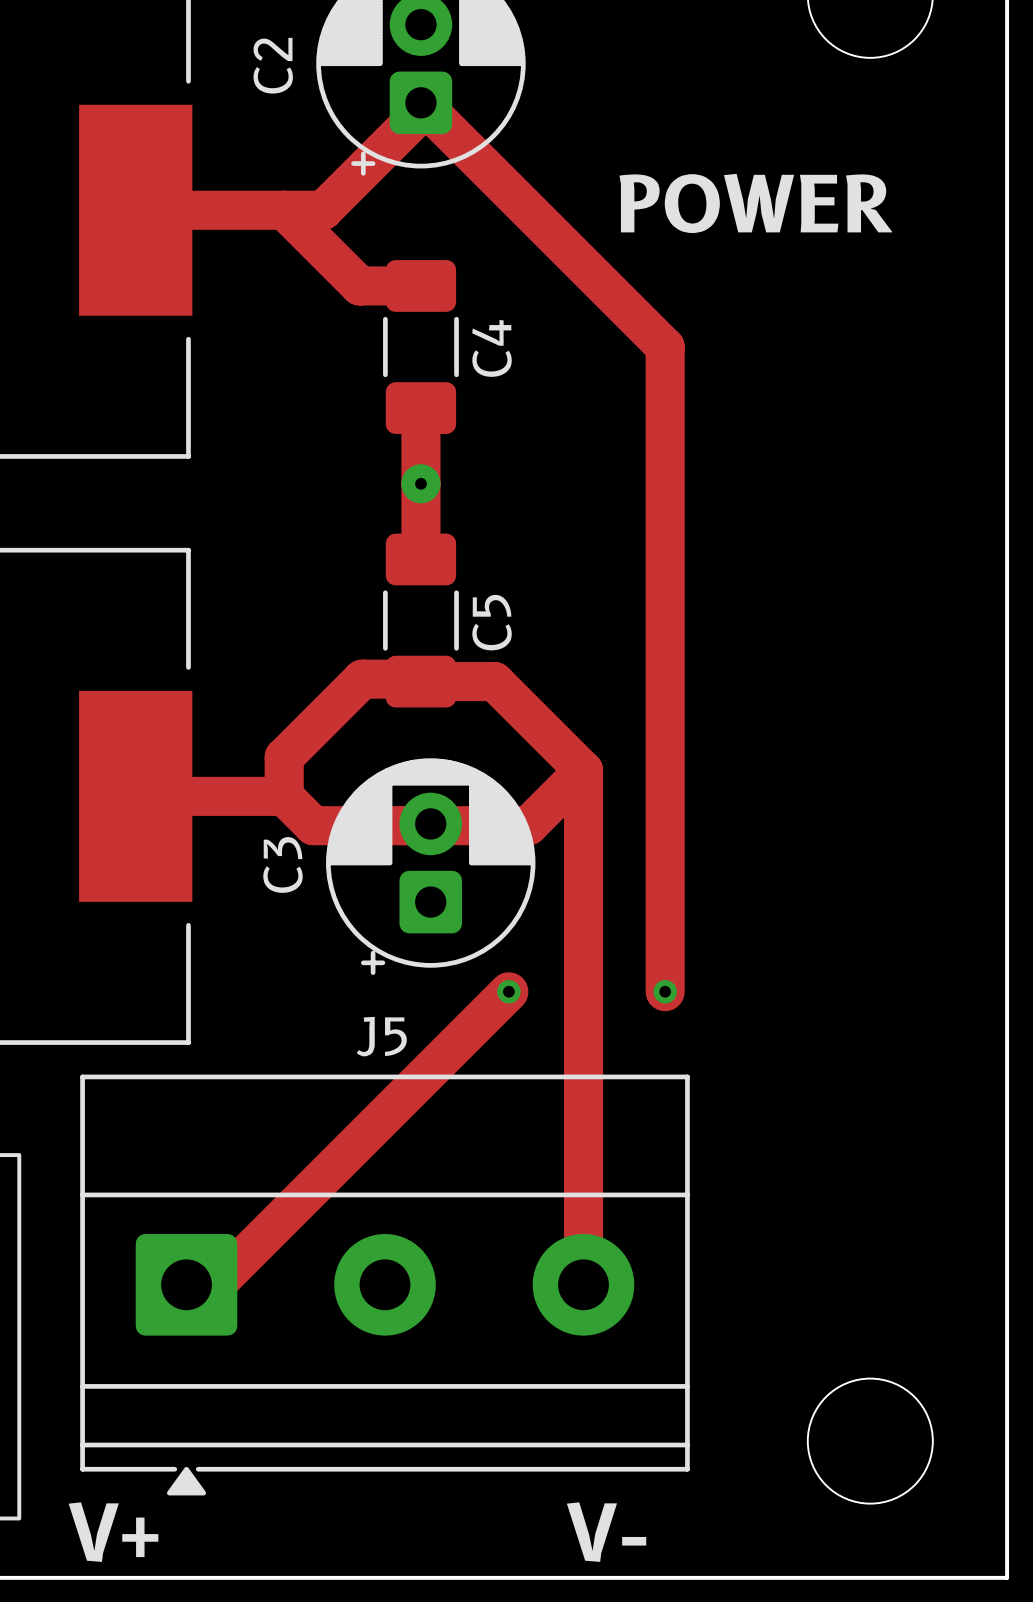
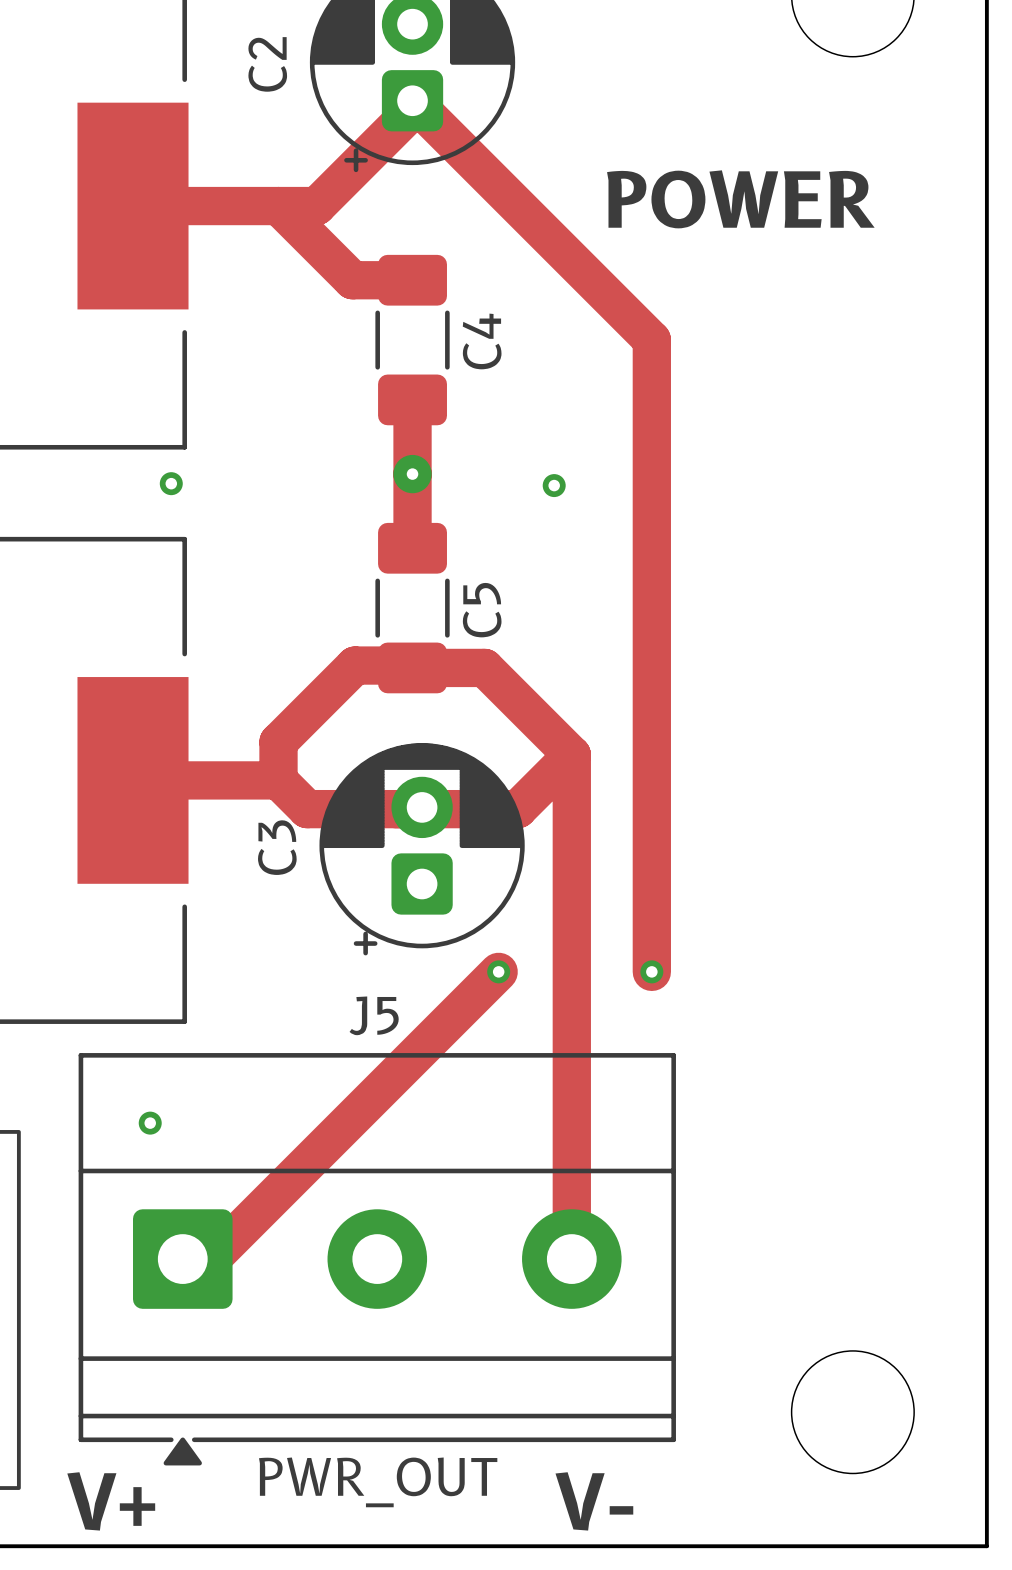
via: none -> (171, 483)
via: none -> (554, 485)
via: none -> (150, 1123)
J5 value: none -> PWR_OUT (378, 1482)

